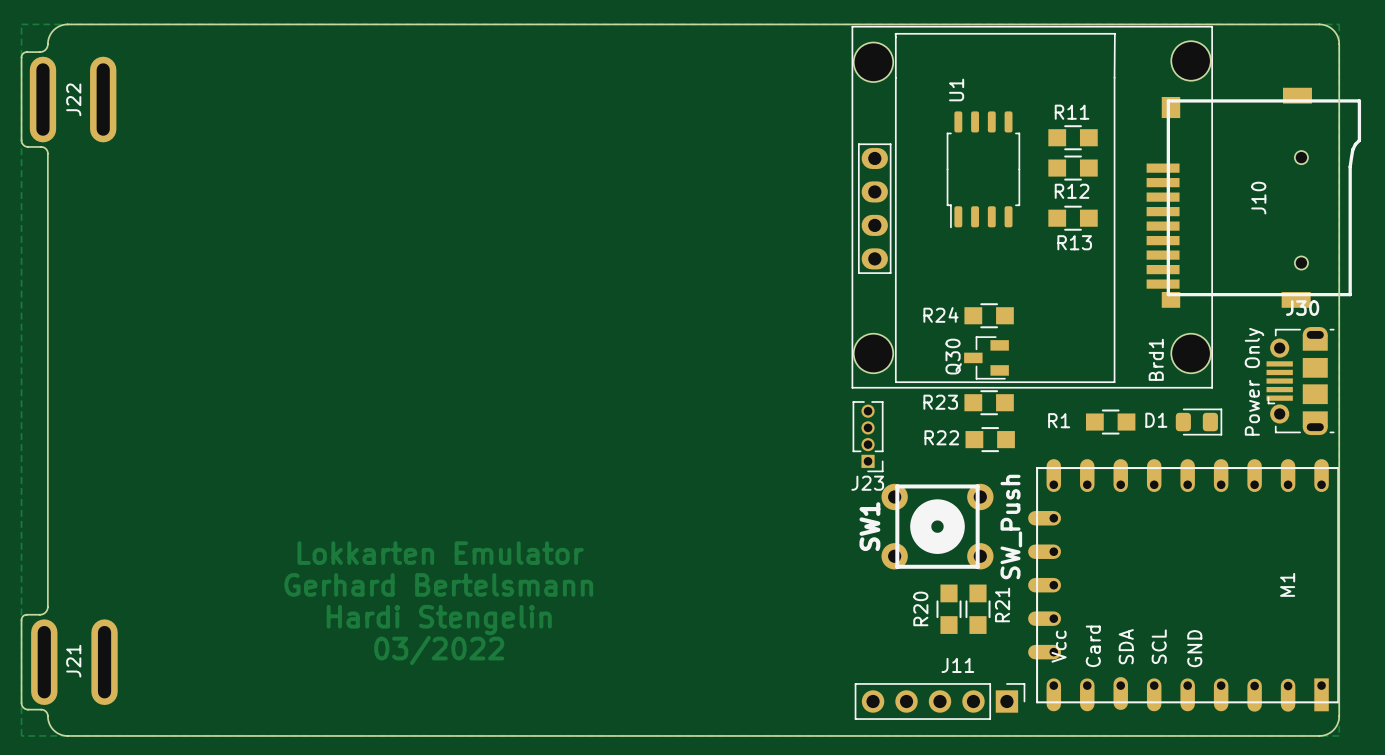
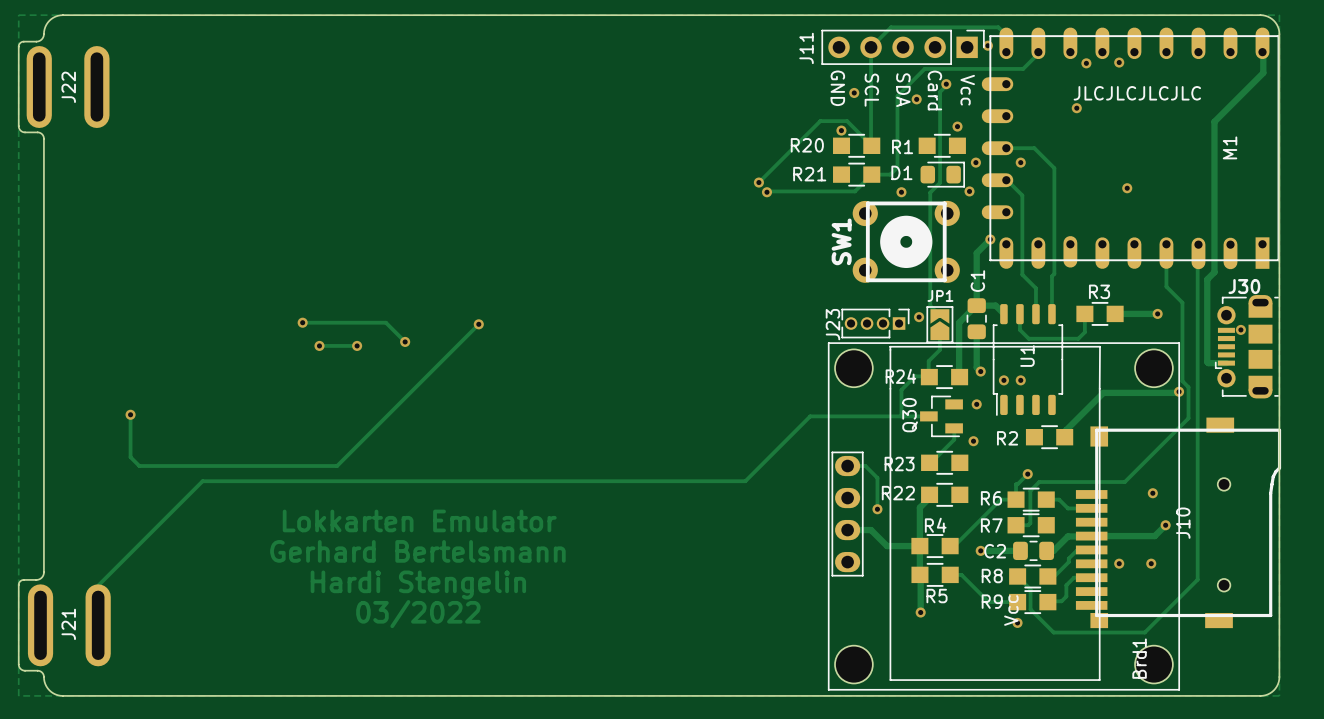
Brd1 footprint: [851, 25, 1213, 389] -> [827, 342, 1180, 691]
via: none -> (987, 45)
track: none -> (870, 48) (891, 27) (998, 27) (1006, 35) (1006, 52)
track: none -> (871, 47) (871, 144) (872, 145)
track: none -> (1038, 52) (1023, 68) (924, 68) (897, 96) (897, 167) (890, 174) (873, 174)
track: none -> (1263, 52) (1263, 72) (1214, 121) (1214, 272) (1207, 279) (1207, 361) (1226, 363)
via: none -> (1119, 62)
via: none -> (1086, 63)
U1 name position: U1 (956, 89) -> U1 (1027, 356)
track: none -> (946, 84) (940, 91) (940, 182) (930, 192) (930, 305) (939, 315)
via: none -> (946, 84)
text: none -> GND (837, 88)
text: none -> SCL (871, 90)
text: none -> SDA (903, 90)
text: none -> Vcc (967, 90)
text: none -> Card (934, 90)
via: none -> (854, 92)
text: none -> JLCJLCJLCJLC (1137, 93)
via: none -> (916, 99)
via: none -> (1076, 108)
R12: (1073, 137) -> none
via: none -> (957, 126)
via: none -> (841, 130)
track: none -> (871, 145) (847, 121) (820, 121) (758, 182)
track: none -> (1006, 148) (1034, 148) (1054, 168) (1054, 273) (1051, 276) (1051, 314)
R11: (1073, 168) -> none
U1 position: (983, 169) -> (1027, 359)
via: none -> (975, 162)
via: none -> (1020, 162)
track: none -> (871, 174) (854, 191) (766, 192)
track: none -> (1007, 181) (1022, 195) (1022, 274) (1035, 288) (1035, 314)
J10 position: (1253, 197) -> (1178, 522)
via: none -> (758, 182)
via: none -> (1127, 188)
via: none -> (969, 191)
via: none -> (766, 192)
via: none -> (901, 192)
R13: (1073, 218) -> none
track: none -> (990, 239) (976, 253) (976, 305) (995, 305) (1003, 313)
via: none -> (990, 239)
track: none -> (1166, 244) (1166, 286) (1182, 302) (1182, 381) (1188, 387) (1188, 418) (1124, 482) (1039, 482) (1030, 490) (1030, 523) (1028, 525) (1016, 525)
track: none -> (1198, 245) (1197, 579) (1144, 632) (1053, 632) (1030, 609) (1030, 589) (1017, 576)
R24: (989, 315) -> none
J30 footprint: [1266, 327, 1335, 436] -> [1214, 295, 1279, 399]
track: none -> (975, 305) (959, 322) (959, 376)
track: none -> (1084, 313) (1084, 332) (1078, 338) (1028, 338) (1019, 329) (1019, 315)
R3: none -> (1100, 313)
track: none -> (1115, 313) (1157, 313)
via: none -> (1157, 313)
via: none -> (919, 317)
C1: none -> (976, 318)
track: none -> (302, 322) (385, 322) (405, 341)
via: none -> (302, 322)
track: none -> (478, 324) (337, 466) (139, 466) (130, 457) (130, 414)
via: none -> (478, 324)
JP1: none -> (939, 324)
via: none -> (1240, 329)
track: none -> (976, 331) (976, 367) (980, 371)
track: none -> (939, 333) (939, 349) (928, 361) (928, 373)
Q30 position: (986, 357) -> (941, 416)
via: none -> (405, 341)
track: none -> (319, 345) (357, 345)
via: none -> (319, 345)
via: none -> (357, 345)
J30 value: Power Only (1254, 381) -> none
via: none -> (980, 371)
track: none -> (928, 376) (915, 376) (901, 389) (901, 416)
R23 name: R23 (940, 402) -> R24 (900, 376)
via: none -> (1003, 380)
via: none -> (1020, 380)
track: none -> (1179, 391) (1103, 392) (1066, 430) (1066, 437)
via: none -> (1179, 391)
R1 name position: R1 (1059, 420) -> R1 (902, 146)
R1 position: (1110, 422) -> (942, 145)
D1 position: (1198, 422) -> (942, 174)
via: none -> (976, 404)
J23 rotation: 0° (868, 436) -> 90° counterclockwise (875, 323)
J23 position: (868, 436) -> (875, 323)
R22 position: (990, 439) -> (944, 494)
via: none -> (130, 414)
track: none -> (928, 416) (810, 416) (745, 481) (202, 481) (98, 585) (98, 625)
track: none -> (954, 429) (954, 439) (929, 462)
R2: none -> (1049, 437)
via: none -> (973, 441)
J23 name position: J23 (867, 483) -> J23 (832, 324)
R23: none -> (944, 462)
track: none -> (847, 466) (865, 466) (877, 478) (877, 509)
track: none -> (1027, 474) (1016, 484) (1016, 499)
via: none -> (1027, 474)
via: none -> (1152, 493)
SW1 position: (937, 526) -> (906, 241)
track: none -> (931, 496) (919, 507) (920, 574)
SW1 value: SW_Push (1011, 527) -> none
track: none -> (1015, 499) (1000, 499) (954, 546) (950, 546)
R6: none -> (1031, 499)
track: none -> (1046, 499) (1059, 499) (1067, 508) (1092, 508)
via: none -> (877, 509)
R7: none -> (1031, 525)
track: none -> (1165, 525) (1154, 536) (1091, 536)
via: none -> (1165, 525)
track: none -> (848, 530) (871, 530) (887, 546) (919, 546)
track: none -> (1089, 536) (1067, 536) (1053, 550) (1046, 550)
R4: none -> (935, 546)
track: none -> (1092, 550) (1077, 550) (1054, 576) (1047, 576)
track: none -> (980, 550) (1020, 550)
via: none -> (980, 550)
C2: none -> (1033, 550)
M1 position: (1183, 585) -> (1130, 148)
via: none -> (1119, 563)
via: none -> (1151, 563)
R21 name position: R21 (1002, 604) -> R21 (809, 174)
R20 rotation: 0° (949, 609) -> 90° clockwise (856, 145)
R20 position: (949, 609) -> (856, 145)
R21 rotation: 0° (977, 609) -> 90° clockwise (856, 174)
R21 position: (977, 609) -> (856, 174)
R5: none -> (935, 574)
track: none -> (951, 574) (961, 574) (988, 602) (1018, 602)
track: none -> (920, 575) (920, 612)
R8: none -> (1032, 576)
track: none -> (1091, 577) (1073, 577) (1066, 585) (1066, 596) (1061, 601) (1050, 601)
R9: none -> (1032, 602)
text: Card (1093, 646) -> none
text: SDA (1126, 646) -> none
text: SCL (1159, 646) -> none
via: none -> (920, 612)
text: GND (1194, 648) -> none
via: none -> (1017, 622)
J11 name rotation: 0° (957, 665) -> 90° counterclockwise (806, 48)
J11 name position: J11 (957, 665) -> J11 (806, 48)
J11 position: (940, 701) -> (903, 47)

